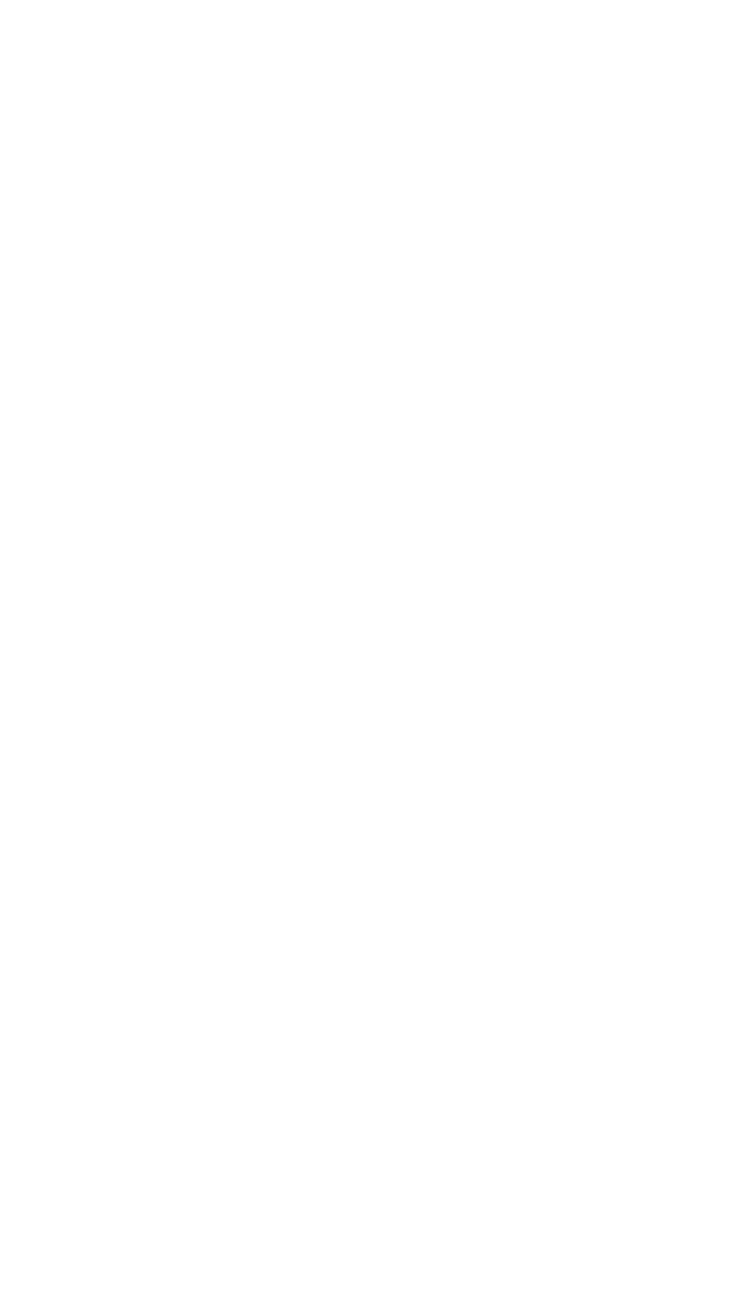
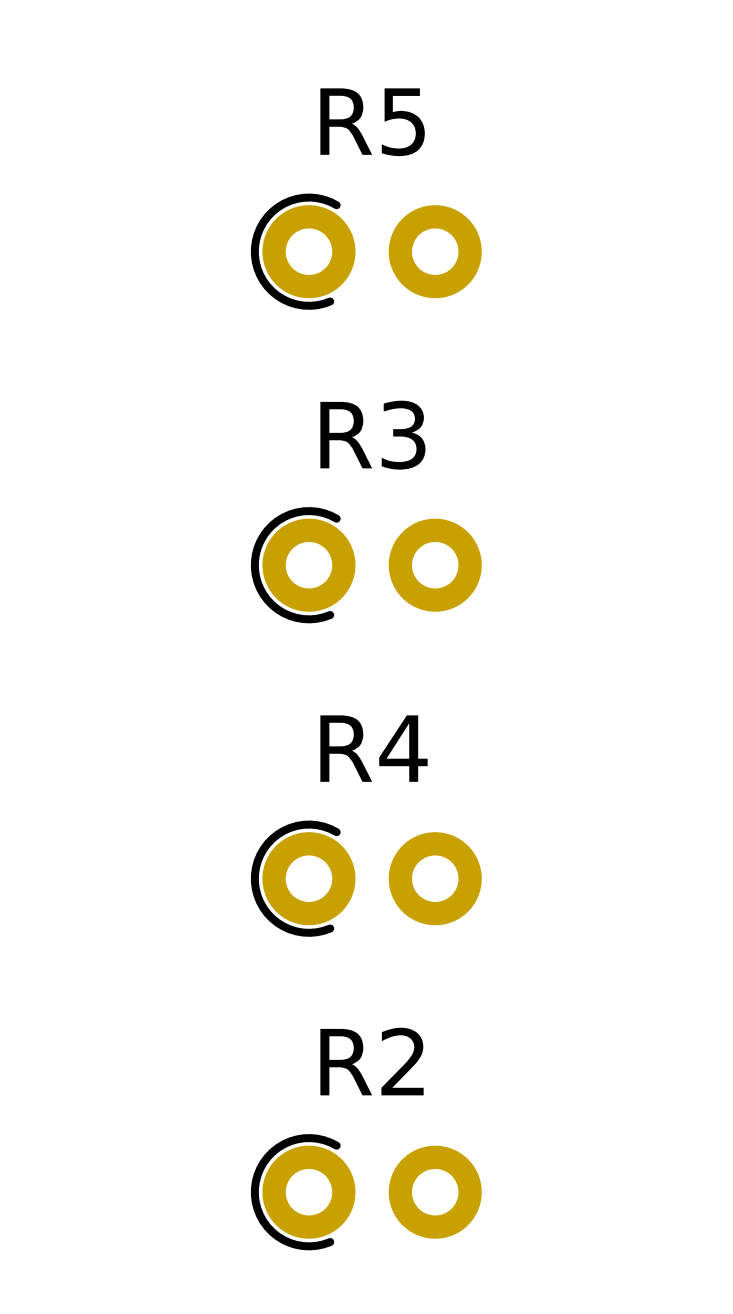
R5: none -> (366, 251)
R3: none -> (366, 565)
R4: none -> (366, 878)
R2: none -> (366, 1192)

